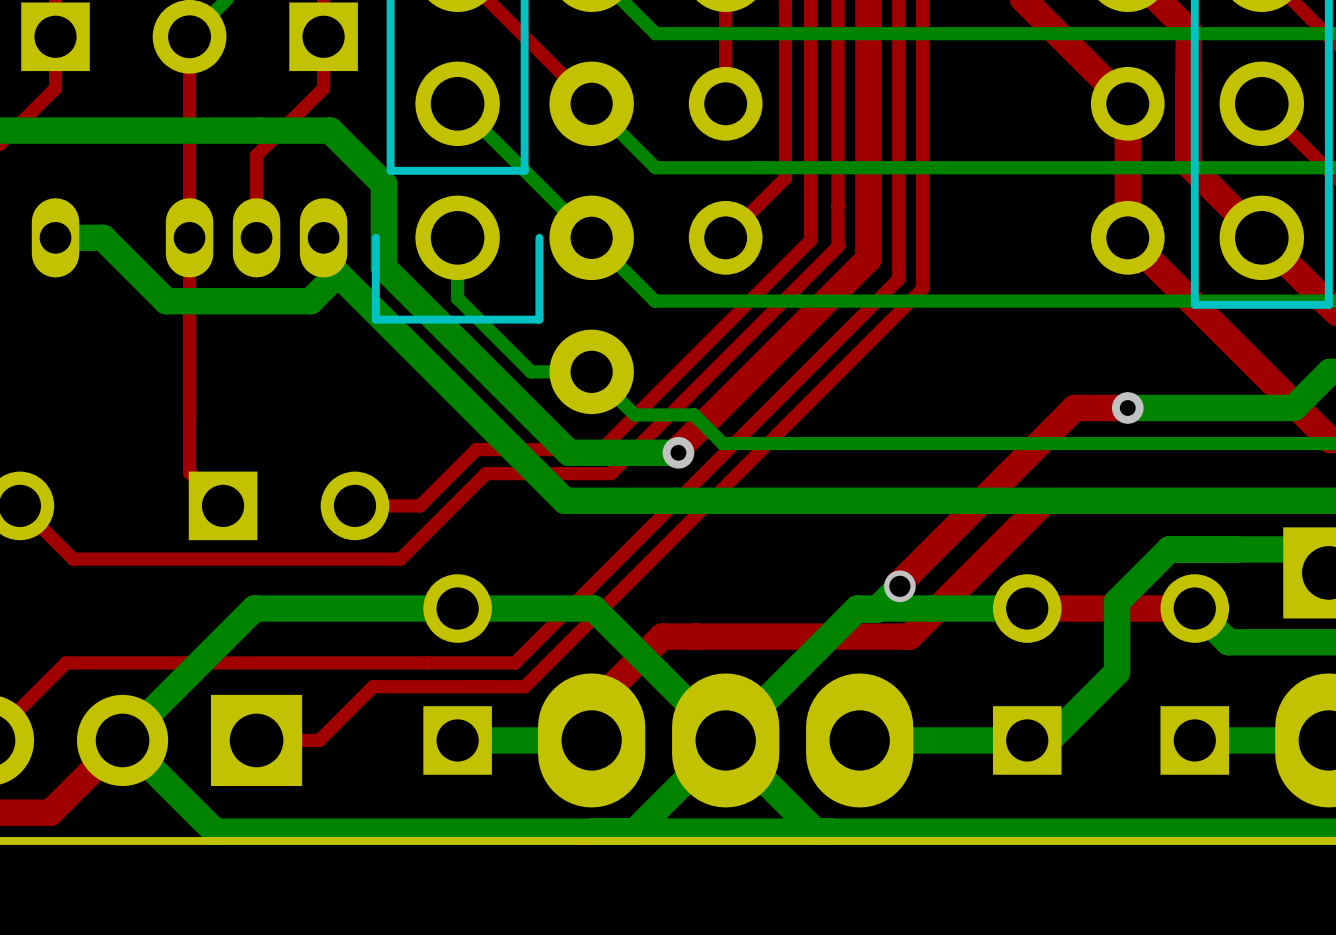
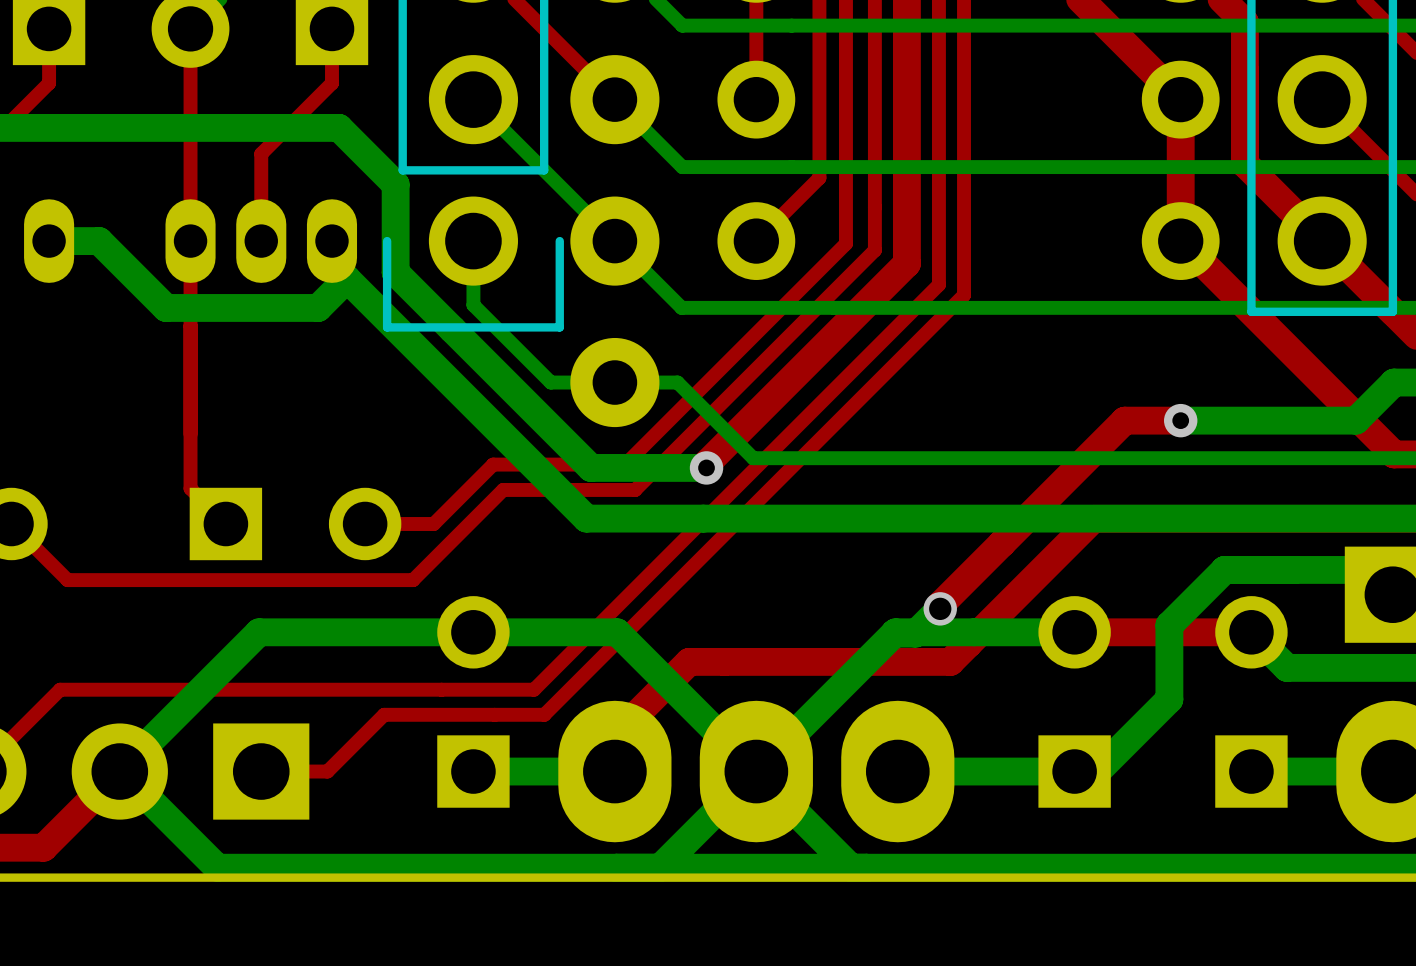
bottom track: (591, 371) (634, 414) (694, 414) -> (614, 382) (677, 382) (723, 428)

